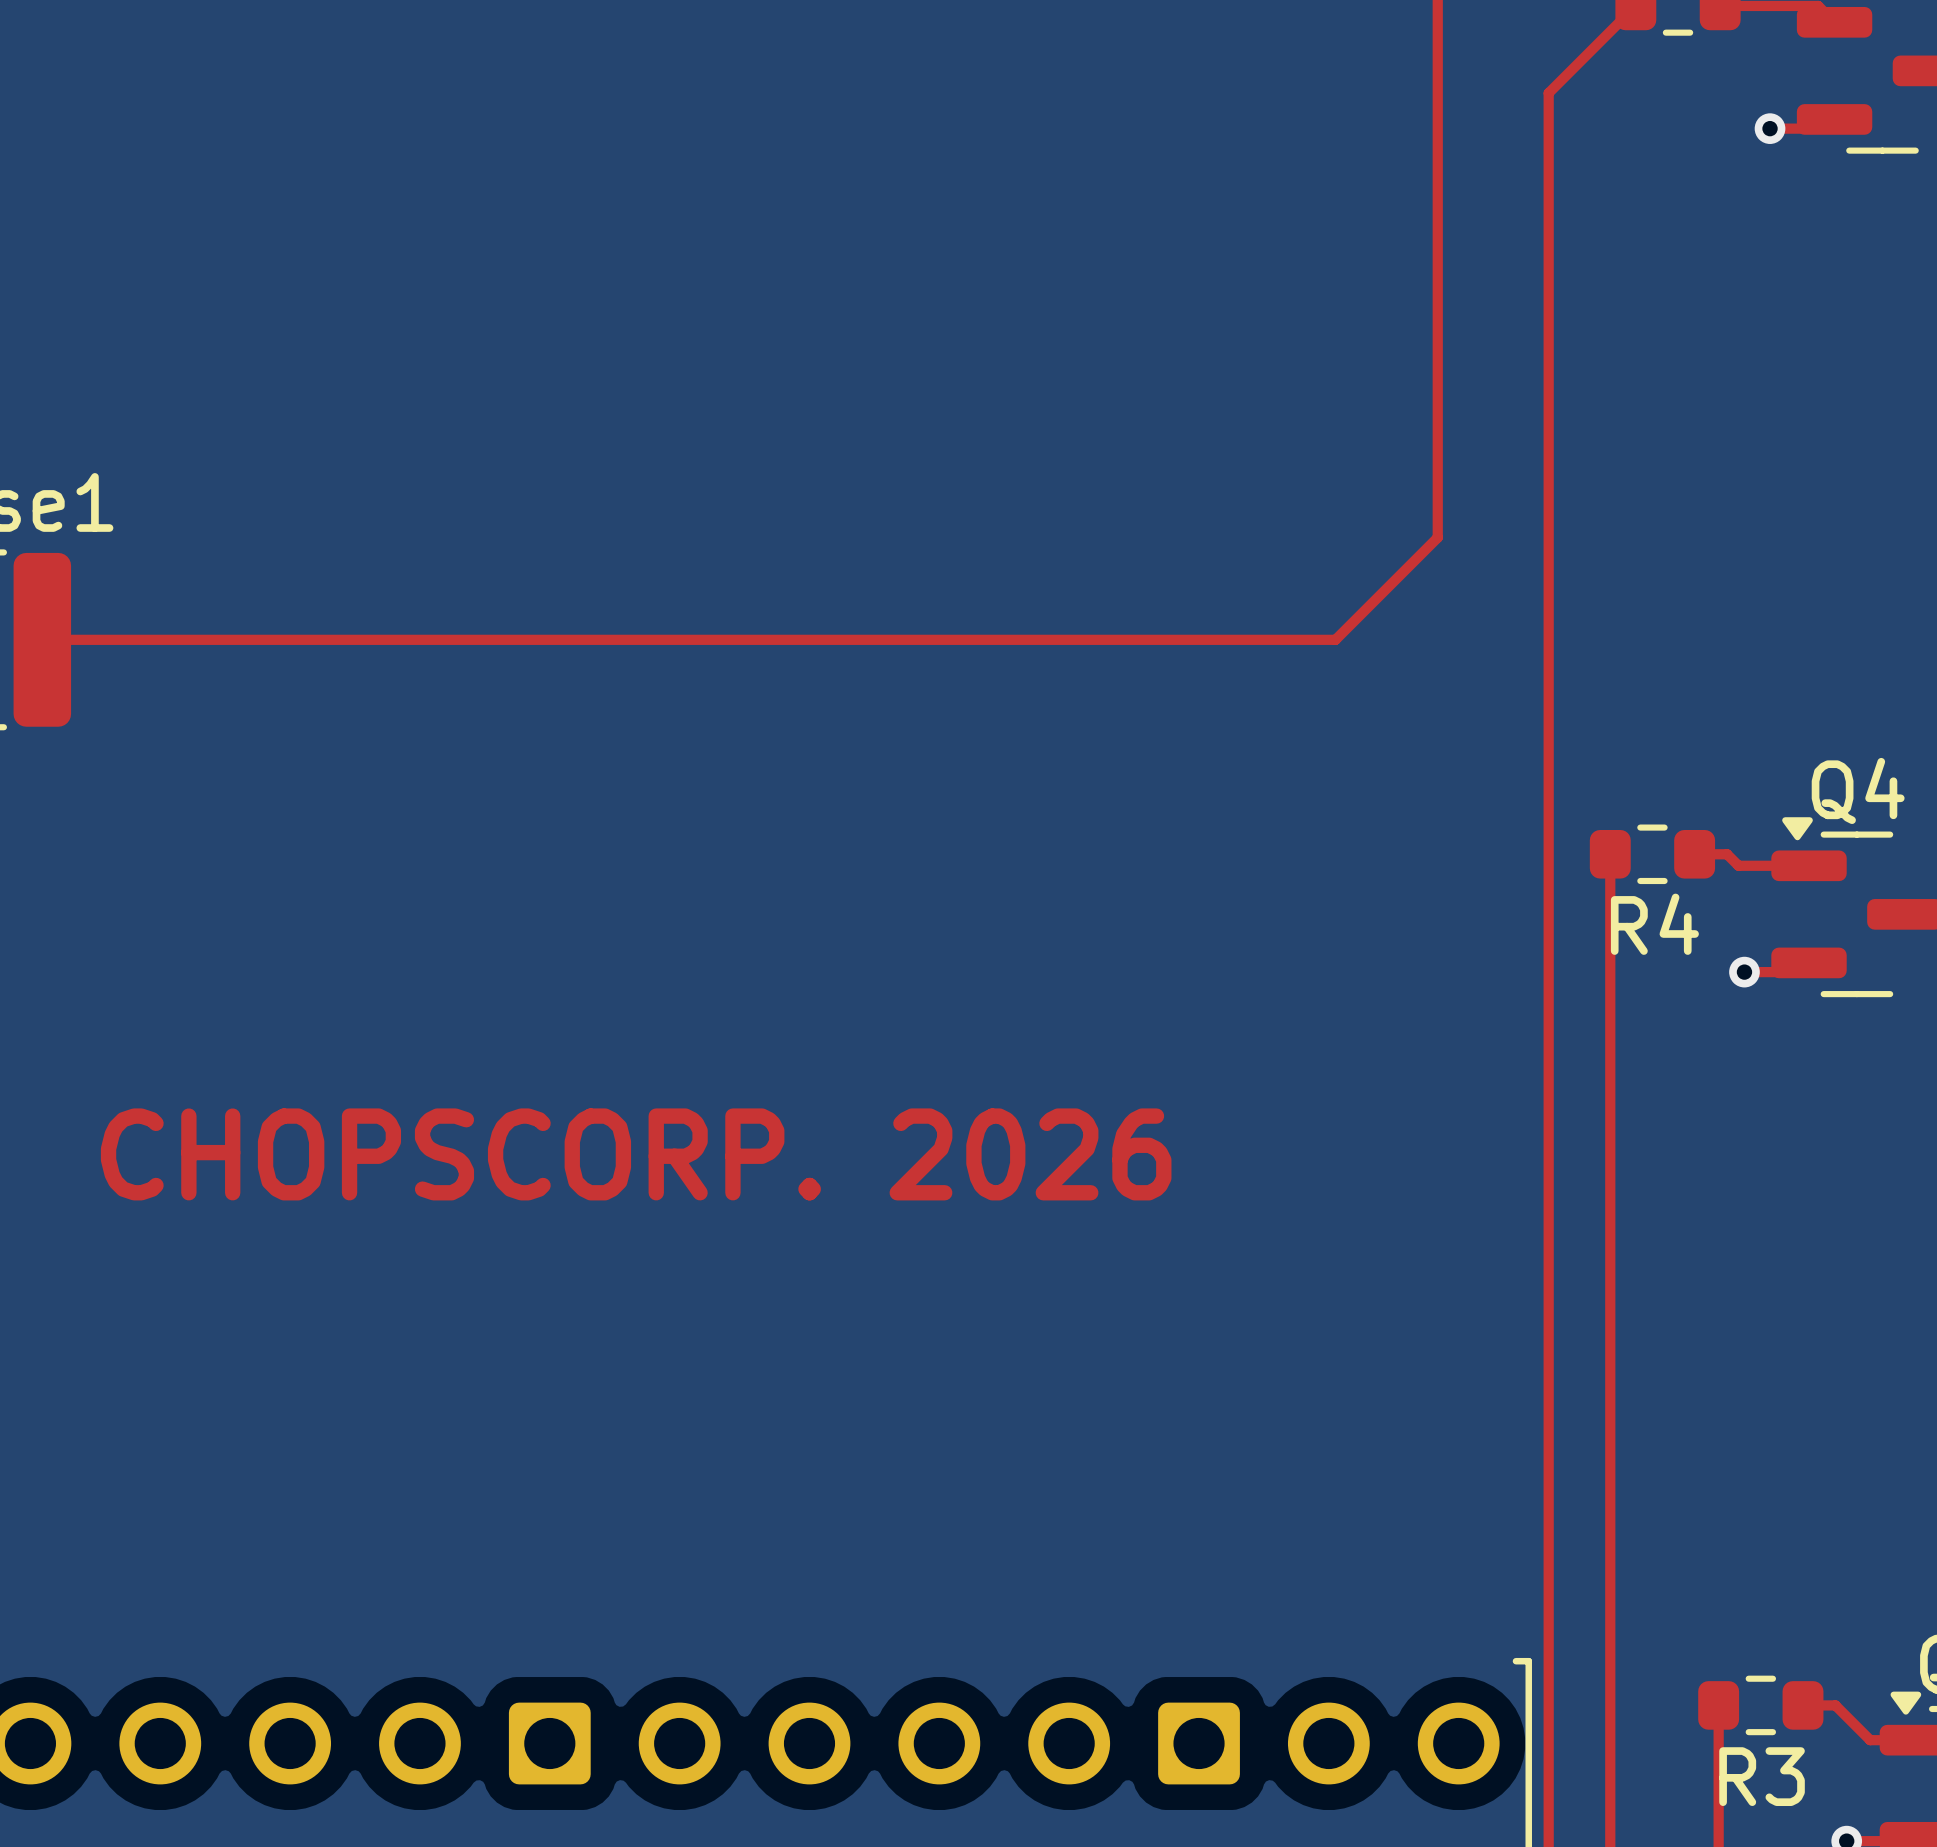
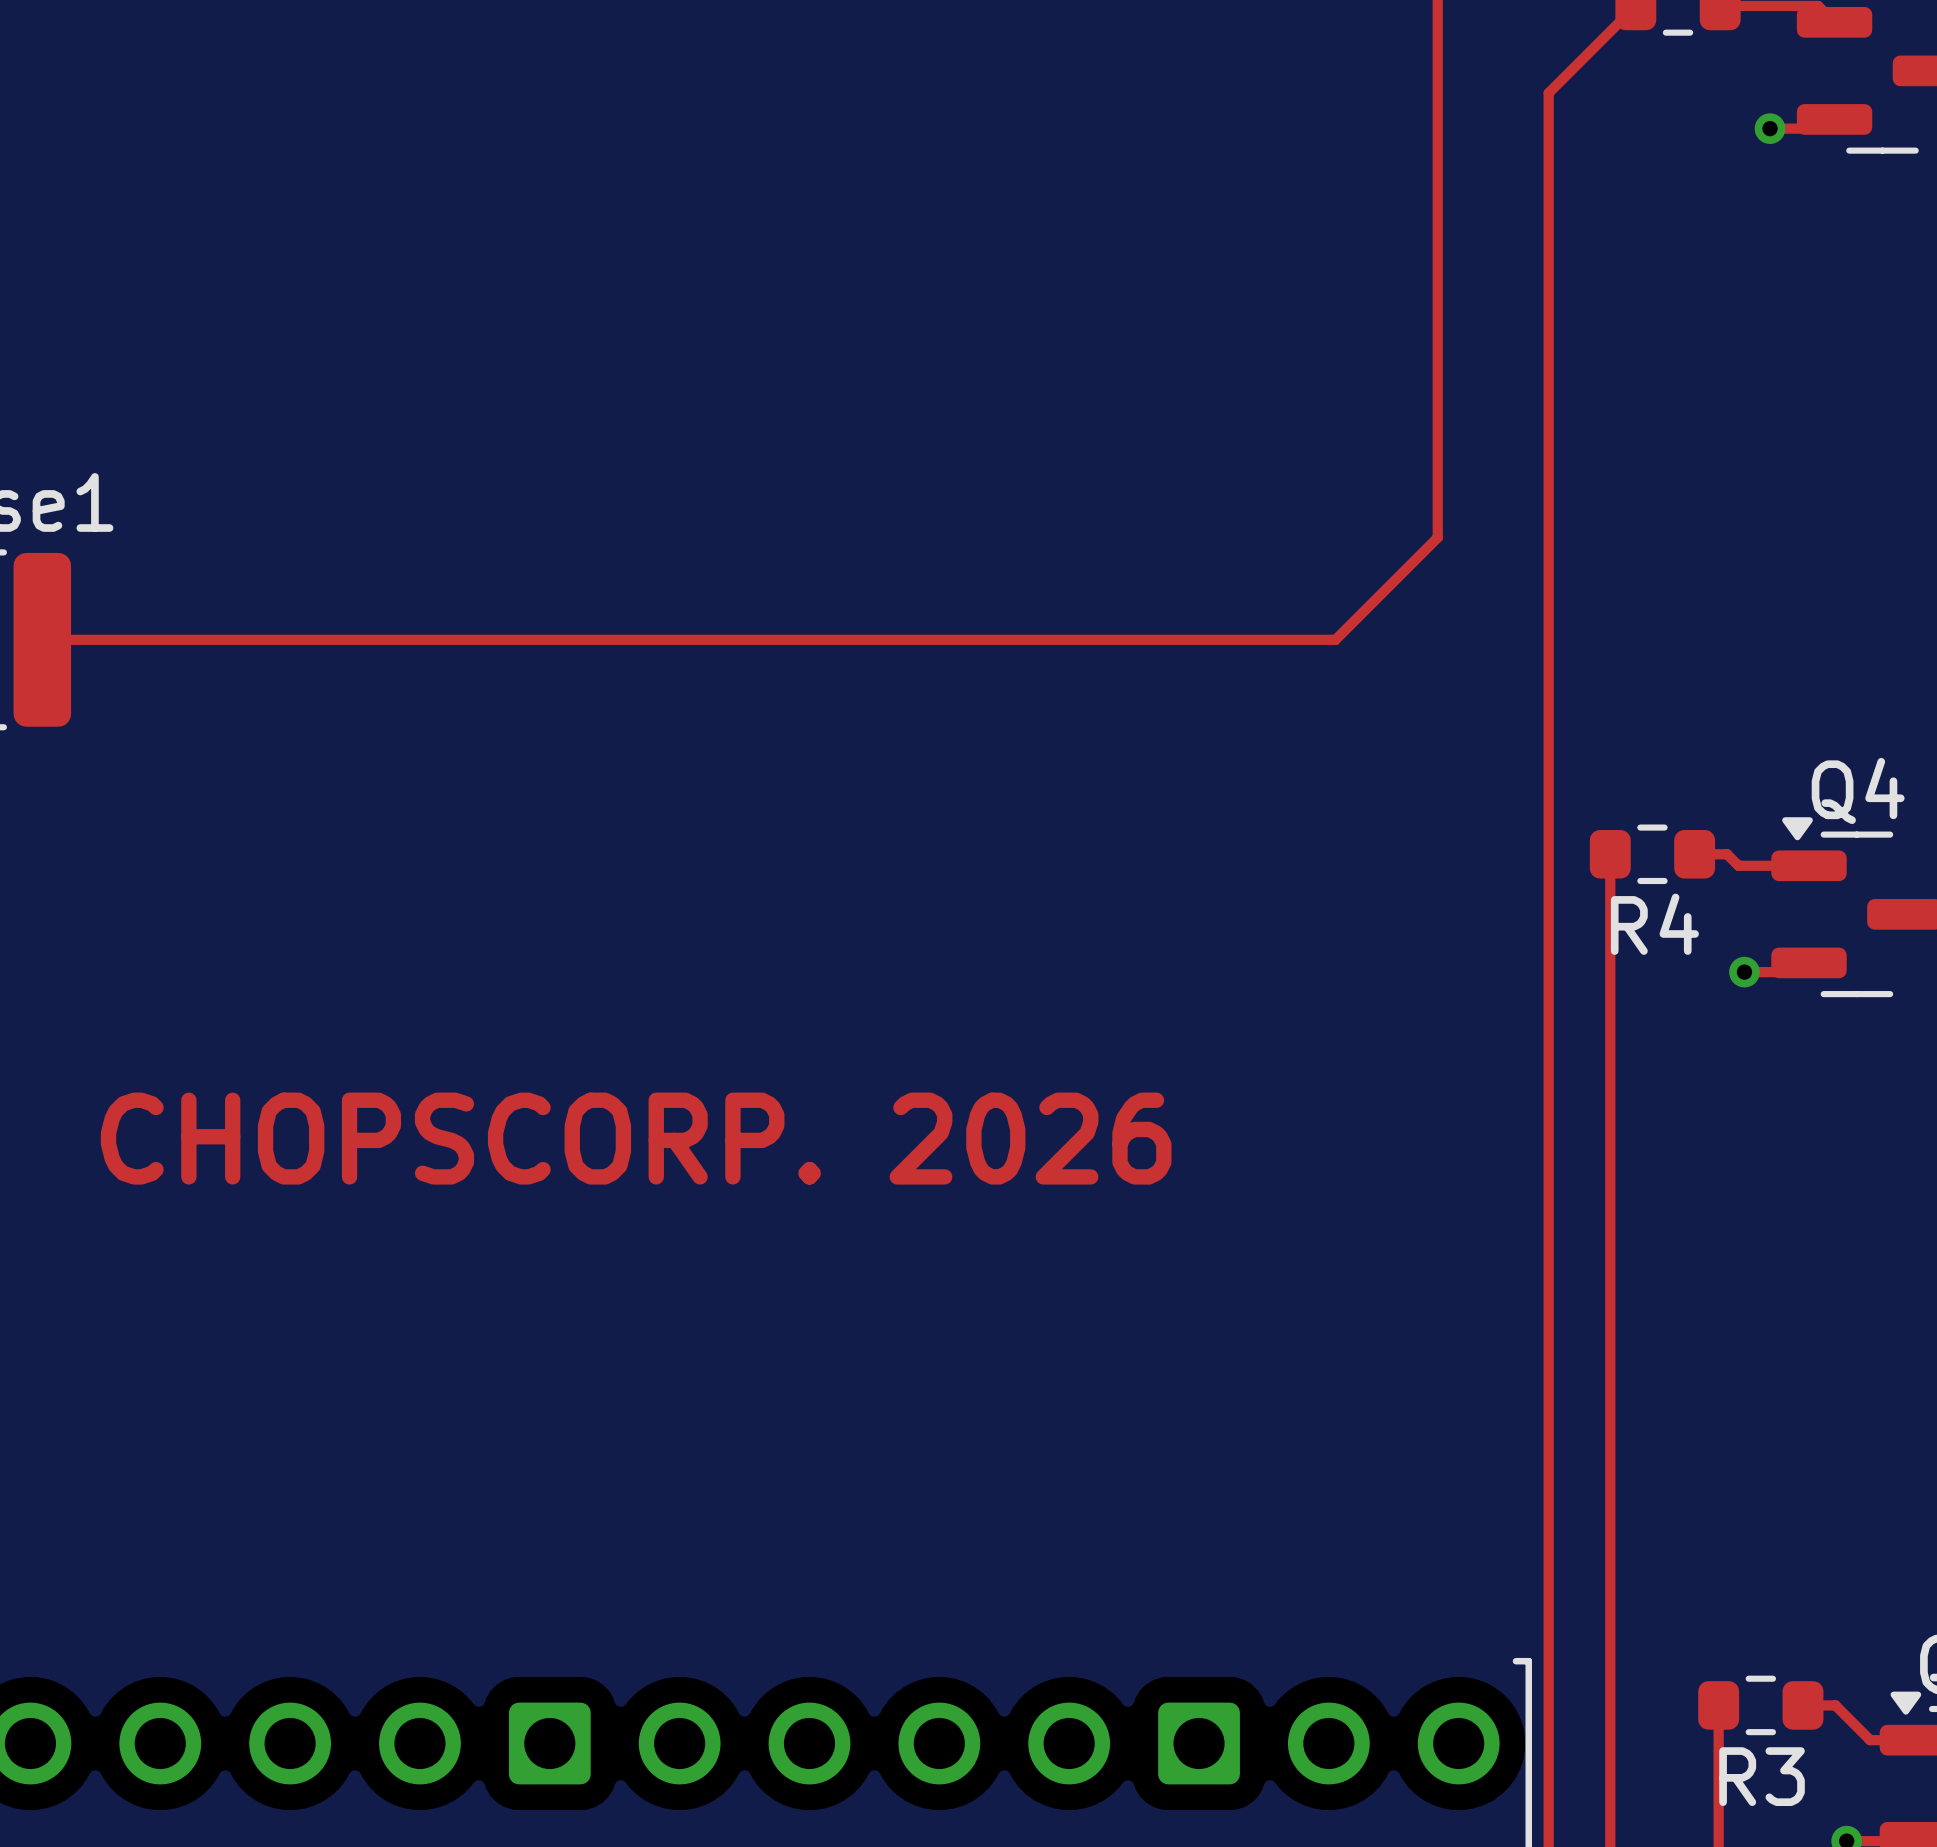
text position: CHOPSCORP. 2026 (636, 1154) -> CHOPSCORP. 2026 (636, 1138)

